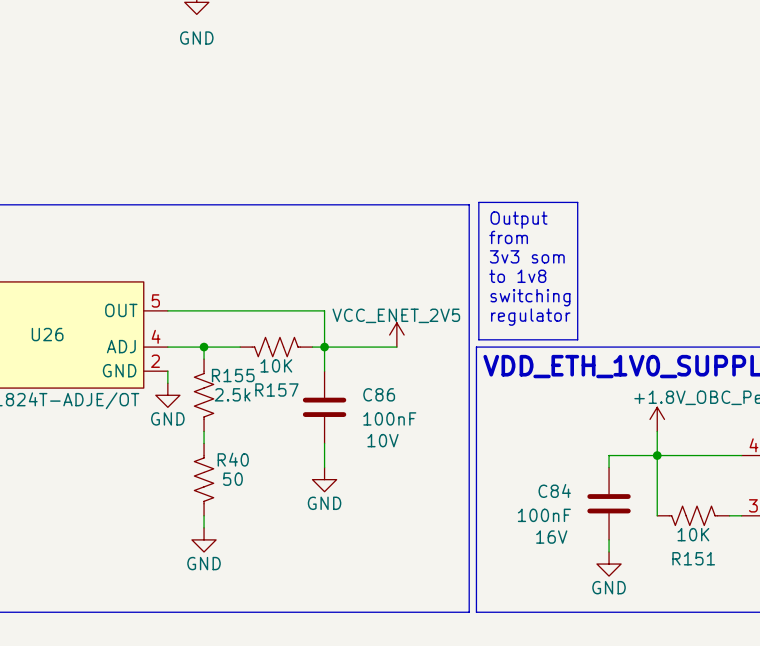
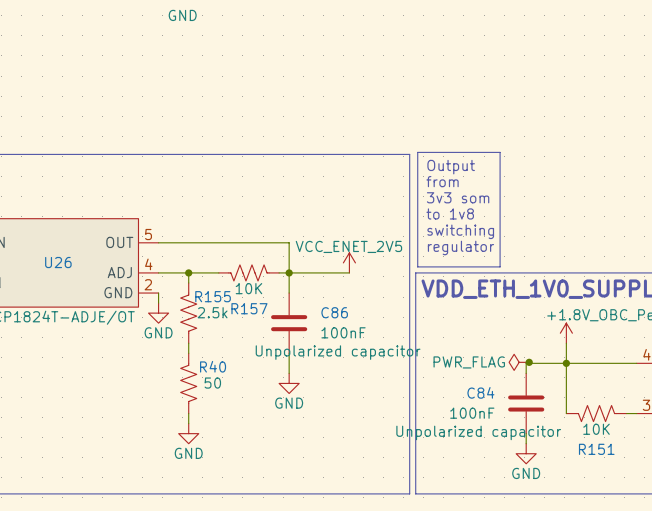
C86 text: 10V (382, 440) -> Unpolarized capacitor (338, 352)
power symbol: none -> PWR_FLAG (519, 362)
junction: none -> (529, 362)
C84 text: 16V (551, 537) -> Unpolarized capacitor (478, 432)

